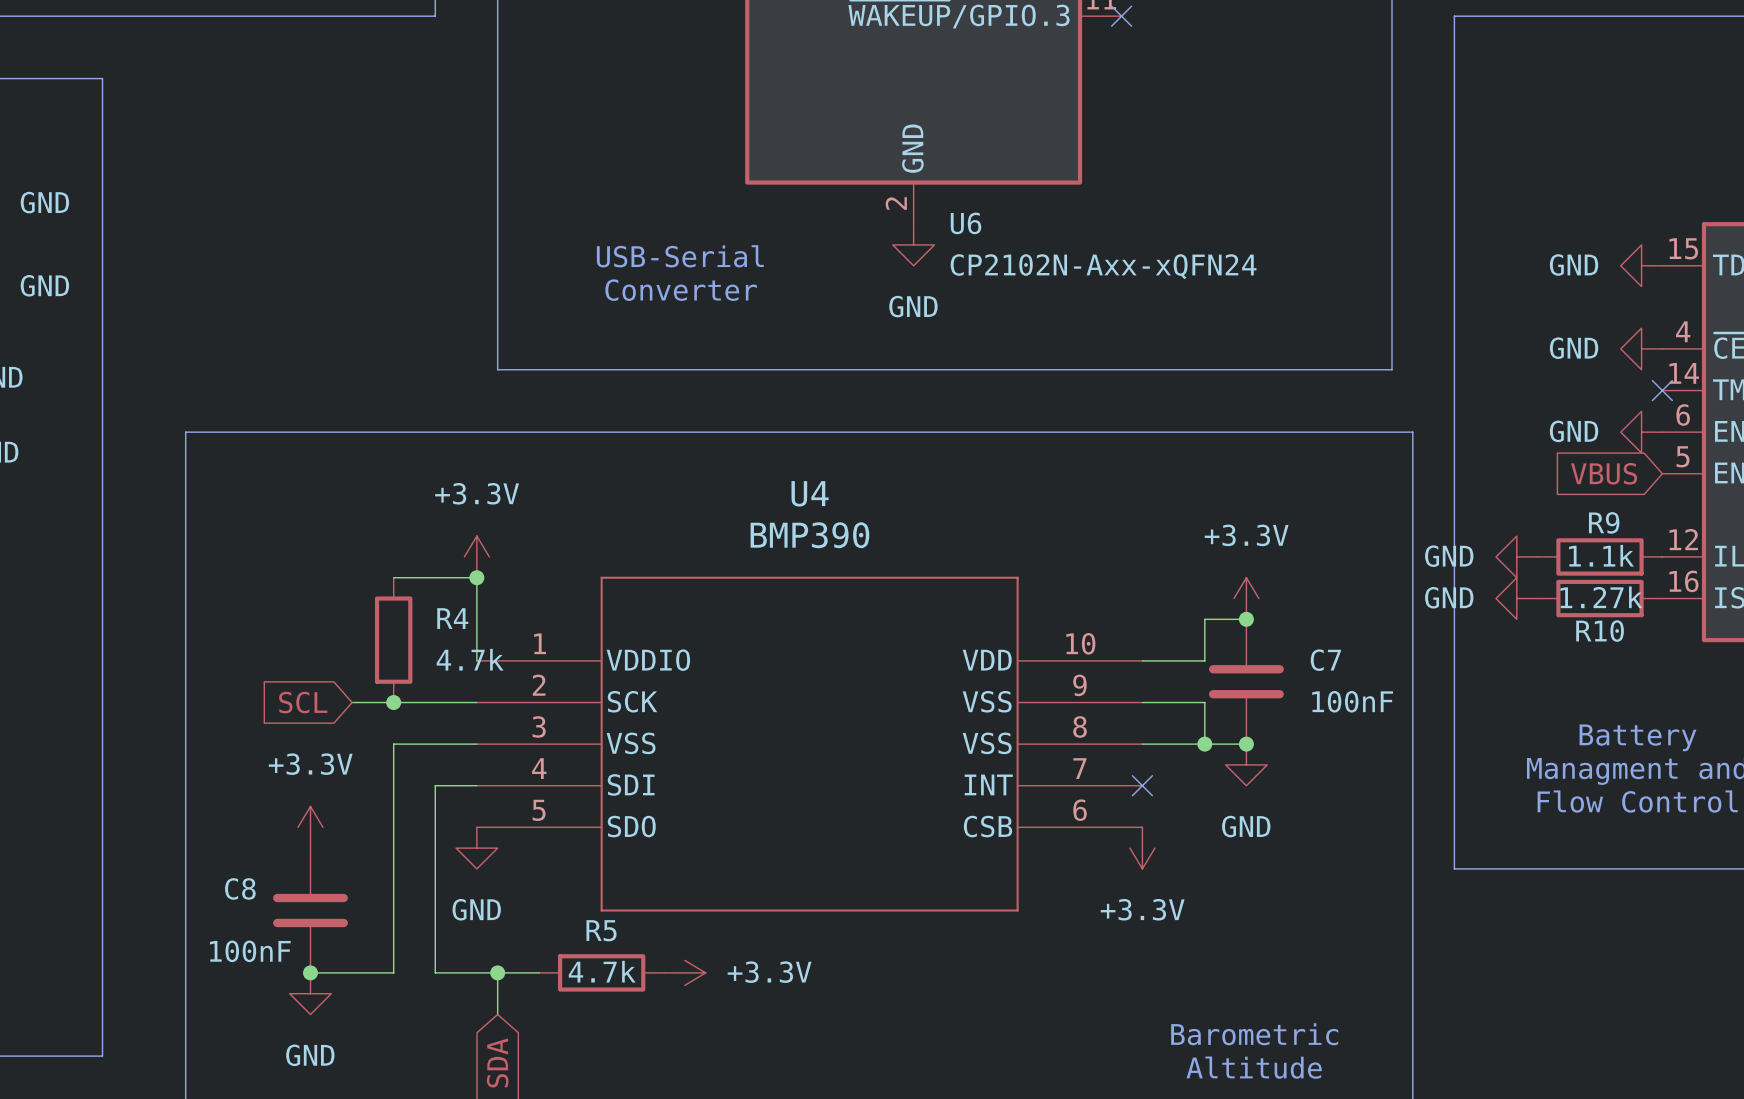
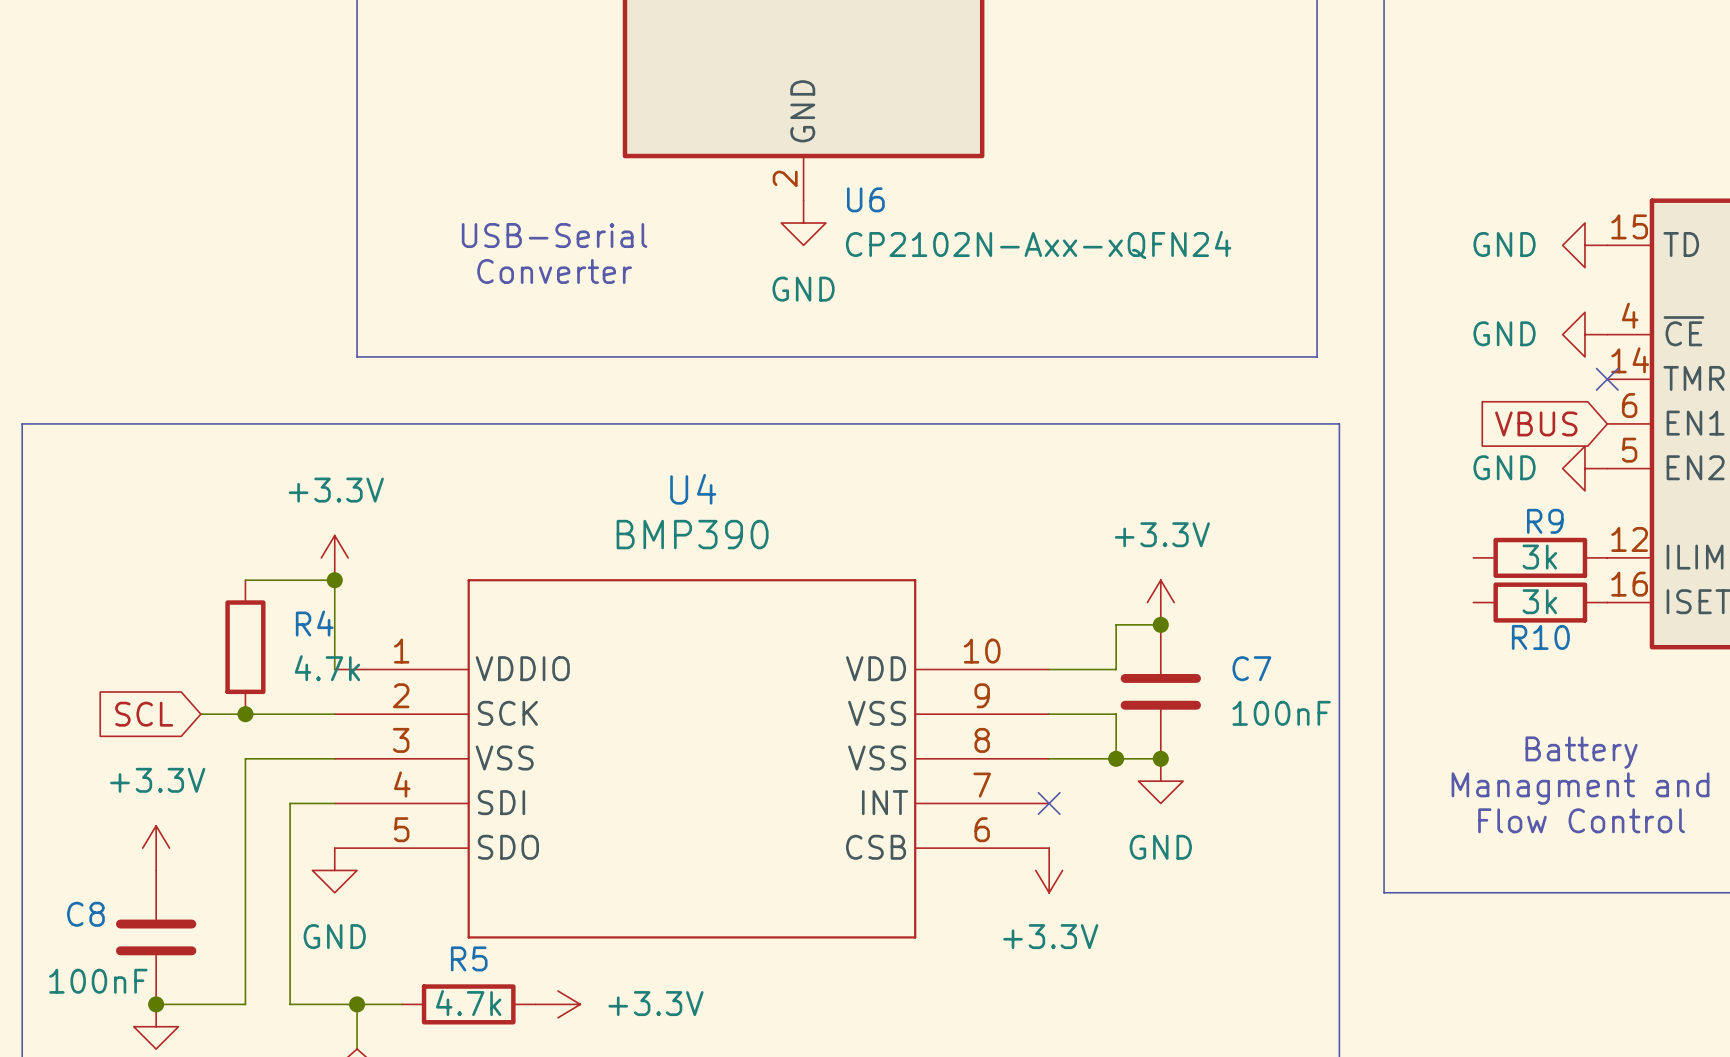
power symbol position: GND (1641, 432) -> GND (1584, 468)
global label position: VBUS (1604, 473) -> VBUS (1536, 423)
R9 value: 1.1k (1601, 555) -> 3k (1539, 557)
power symbol: GND (1516, 556) -> none
R10 value: 1.27k (1601, 597) -> 3k (1539, 601)
power symbol: GND (1516, 598) -> none

